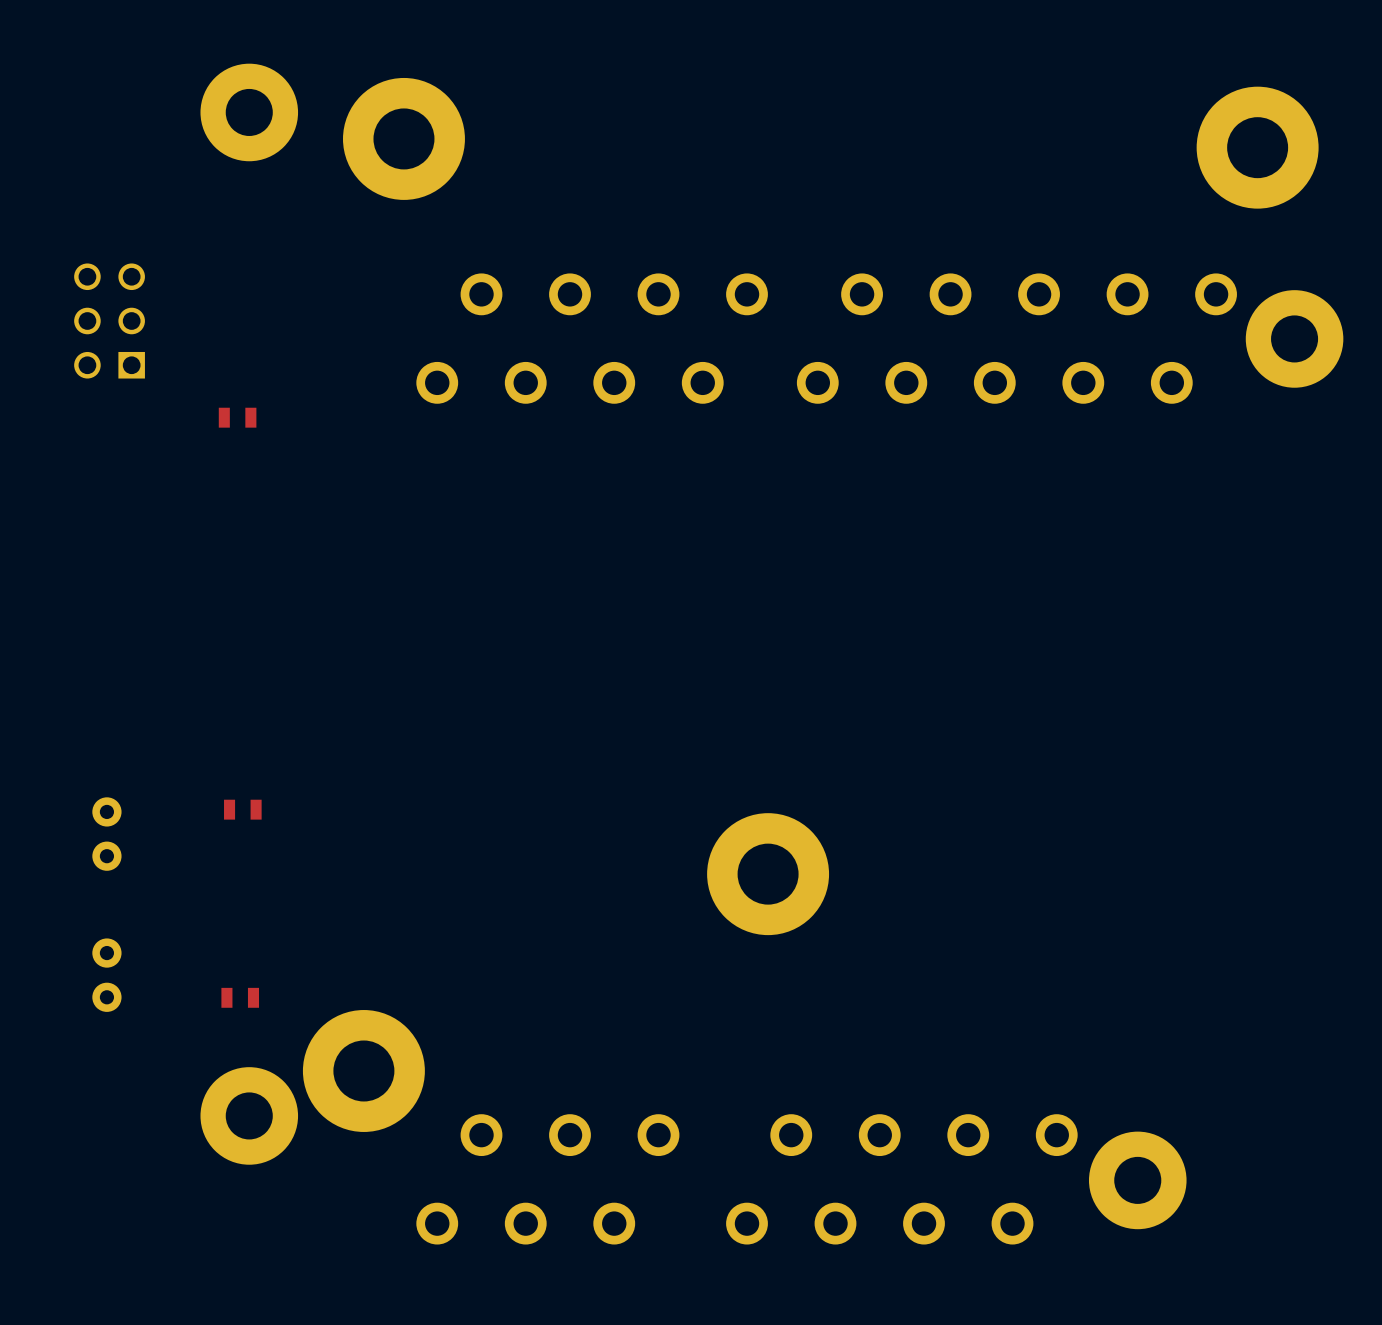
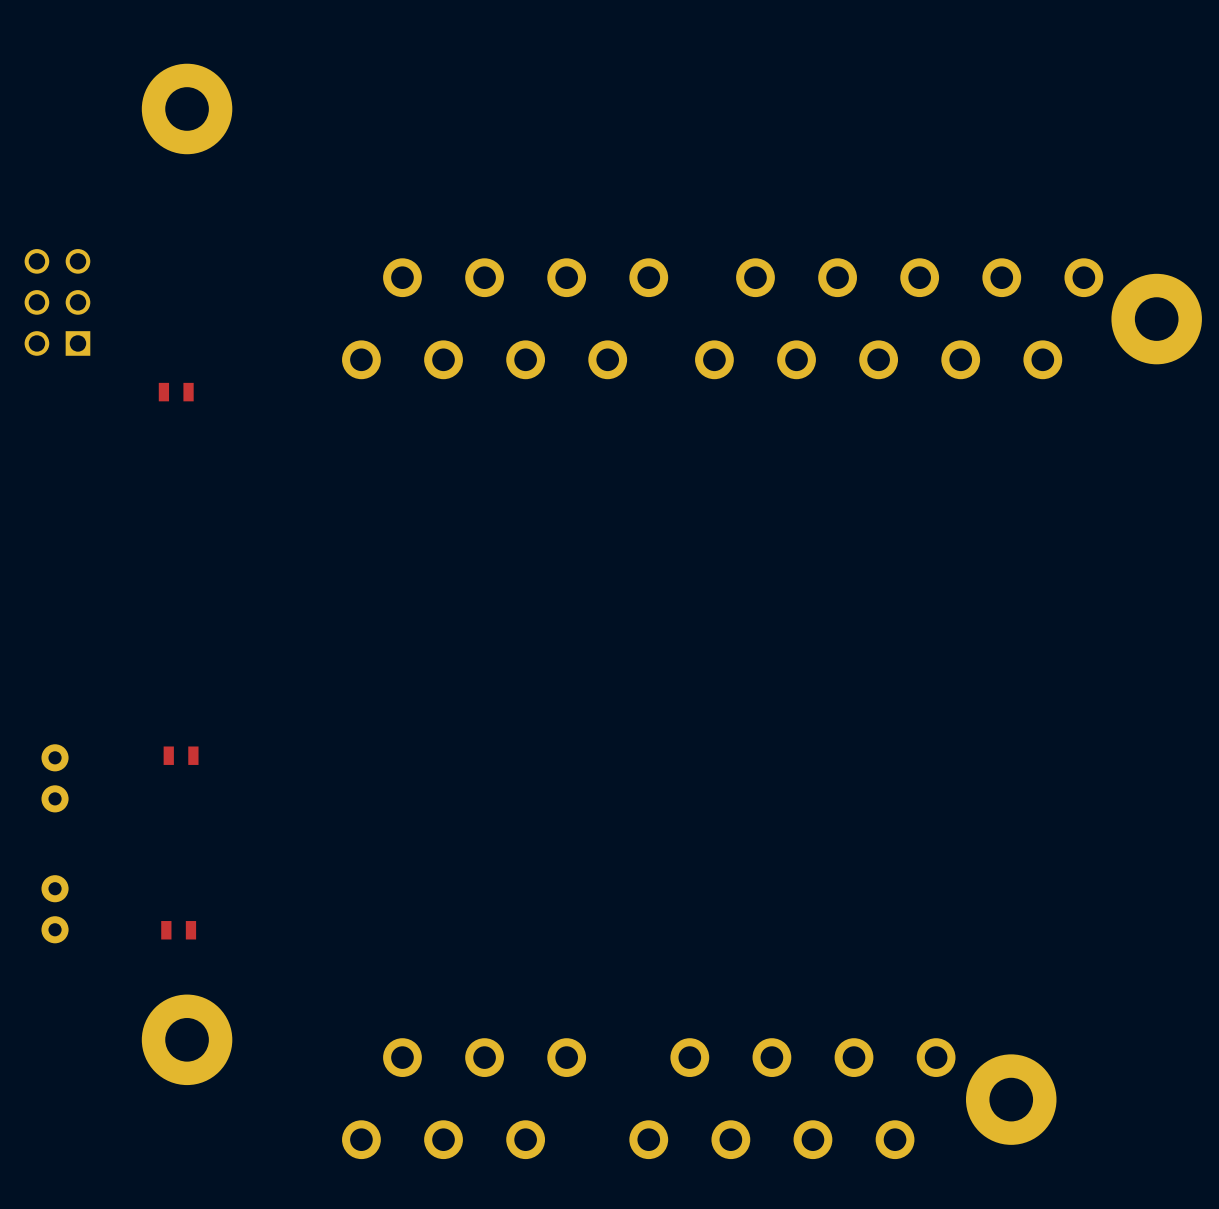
part: (403, 138) -> none
part: (1257, 147) -> none
part: (768, 874) -> none
part: (363, 1070) -> none

